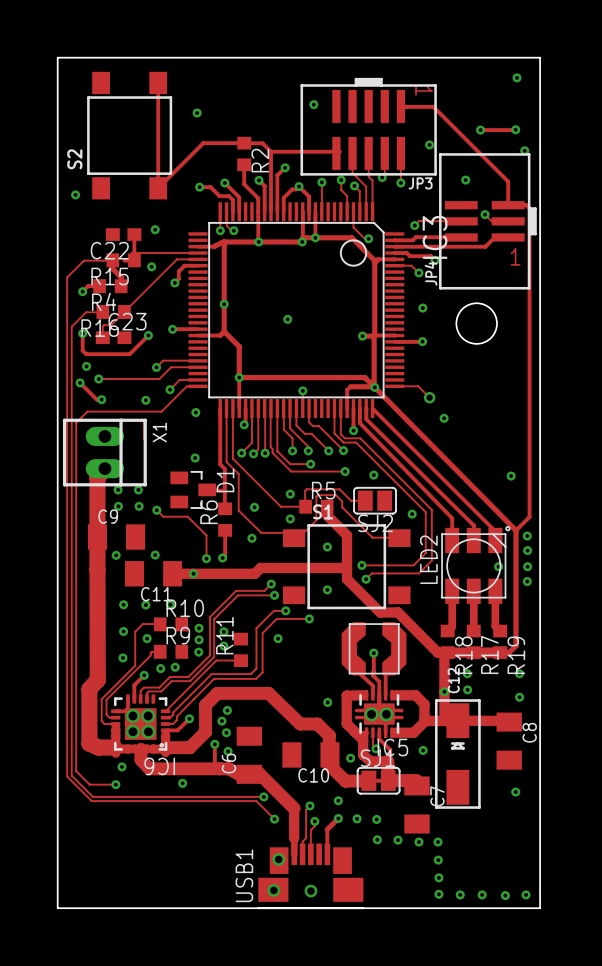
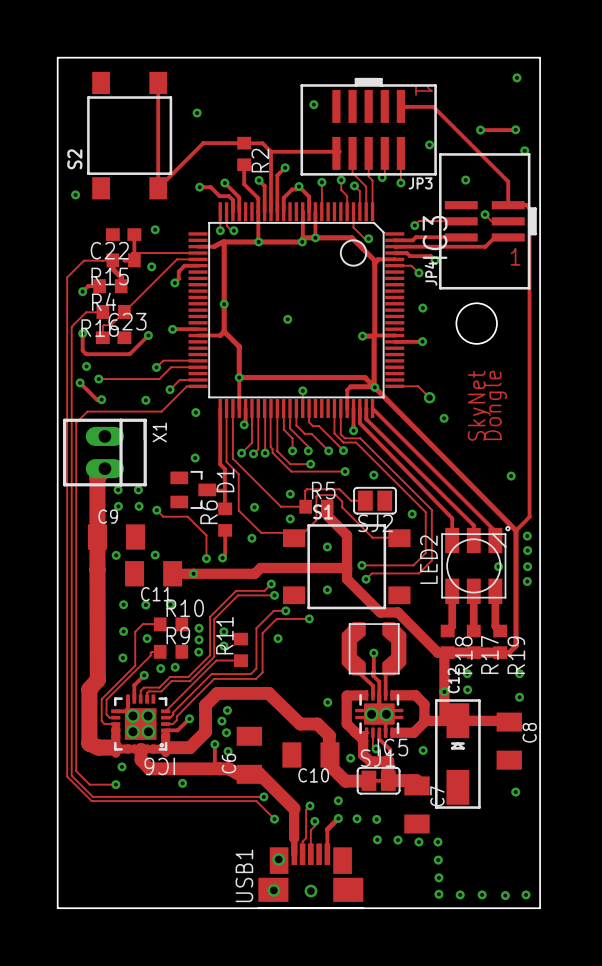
text: none -> SkyNet (479, 405)
text: none -> Dongle (495, 405)

